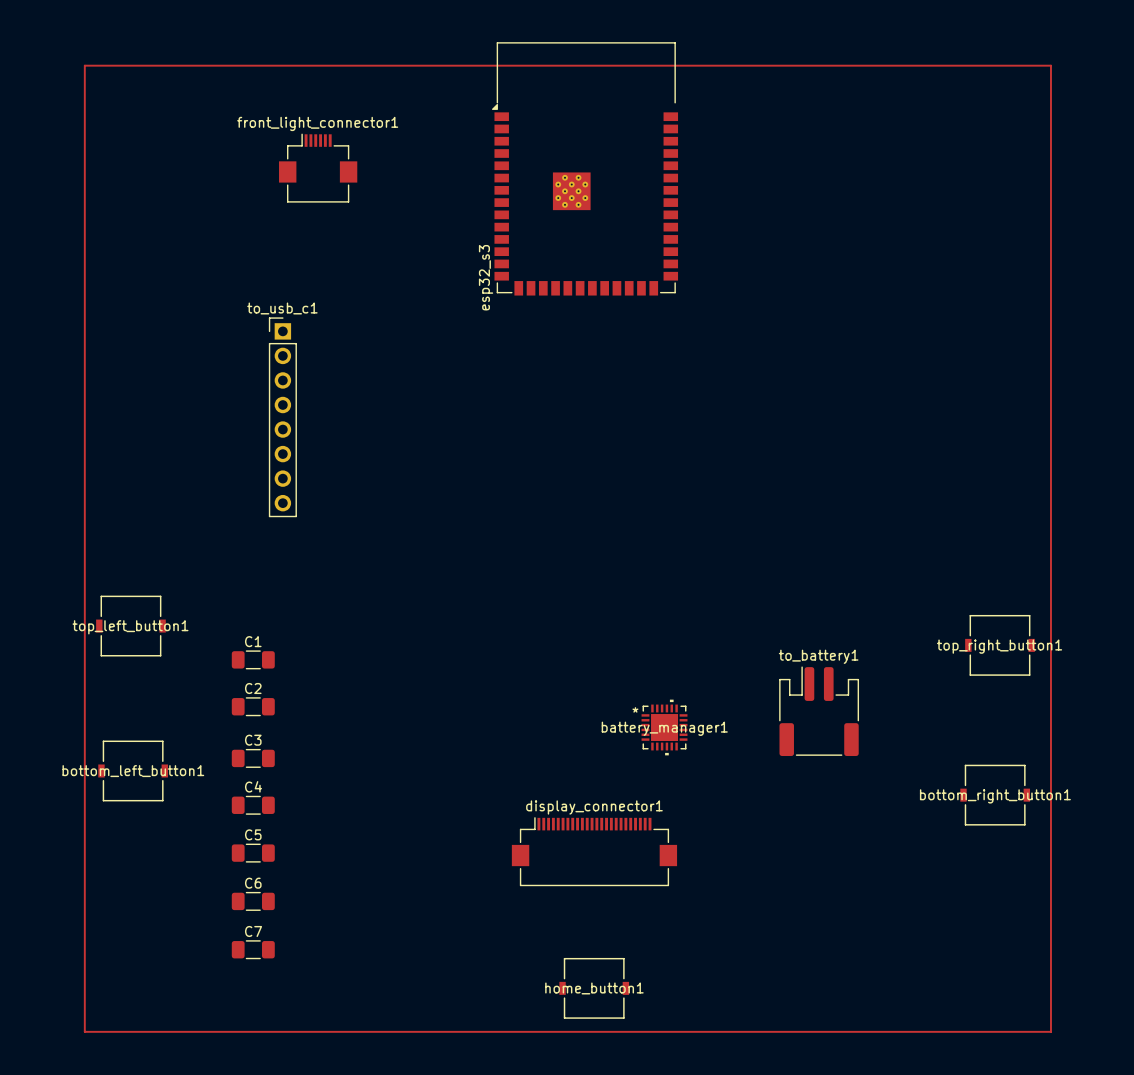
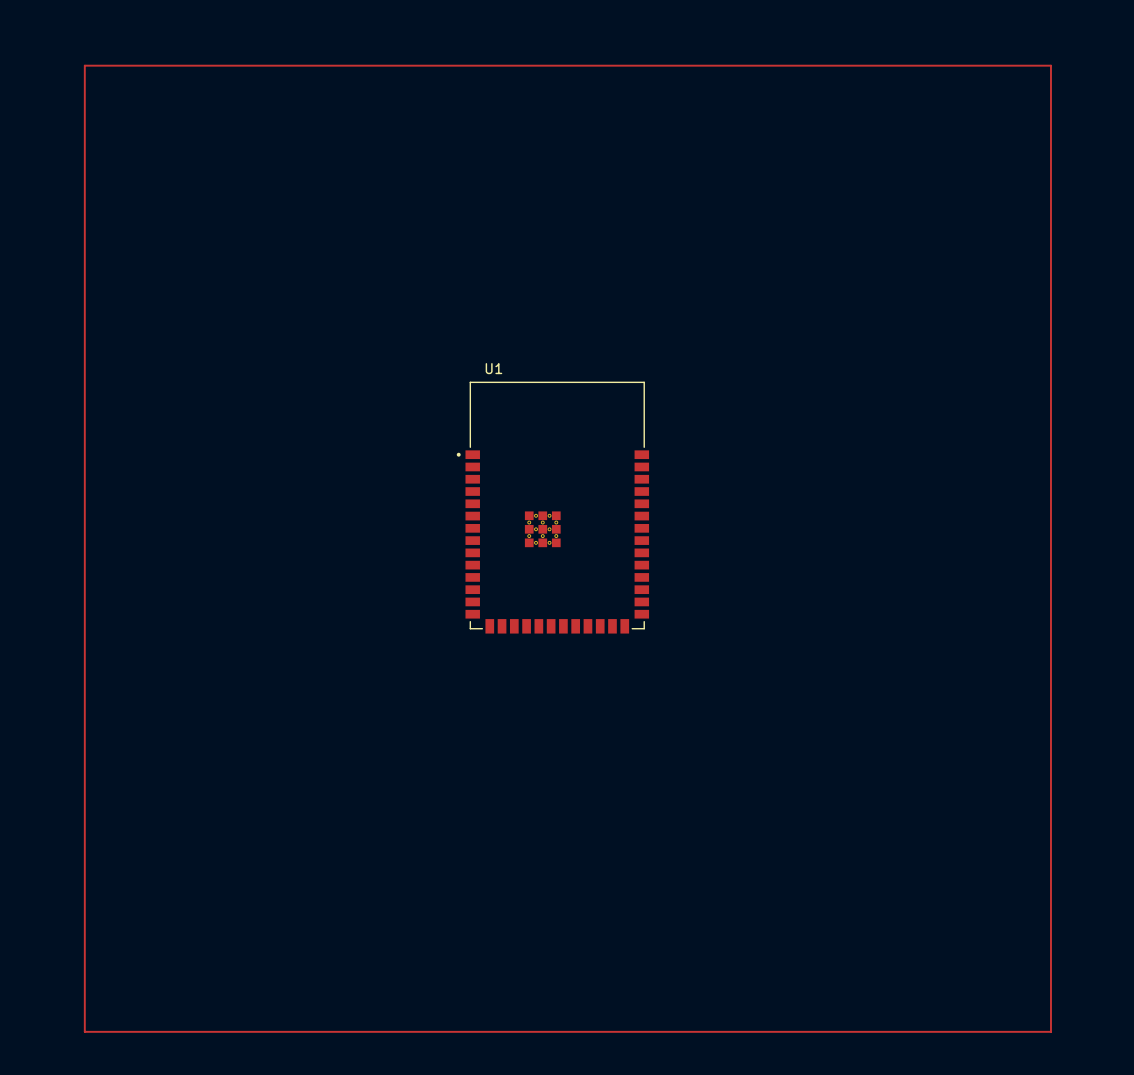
front_light_connector1: (318, 168) -> none
esp32_s3: (585, 168) -> none
to_usb_c1: (282, 417) -> none
U1: none -> (552, 507)
top_left_button1: (130, 626) -> none
top_right_button1: (999, 645) -> none
C1: (253, 659) -> none
C2: (253, 706) -> none
to_battery1: (819, 711) -> none
battery_manager1: (664, 727) -> none
C3: (253, 758) -> none
bottom_left_button1: (133, 770) -> none
bottom_right_button1: (995, 795) -> none
C4: (253, 805) -> none
display_connector1: (594, 851) -> none
C5: (253, 853) -> none
C6: (253, 901) -> none
C7: (253, 949) -> none
home_button1: (594, 988) -> none

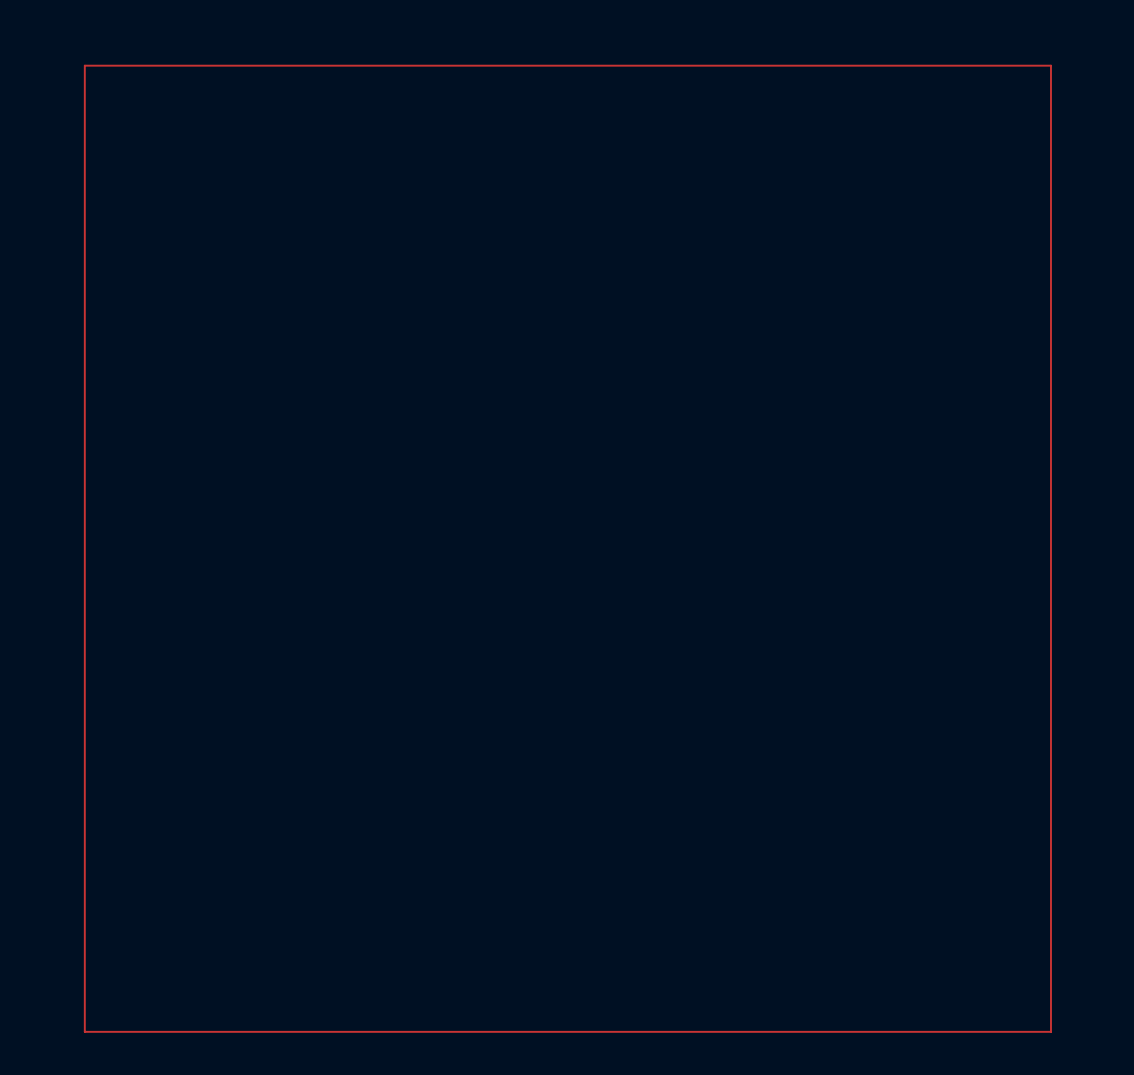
U1: (552, 507) -> none

